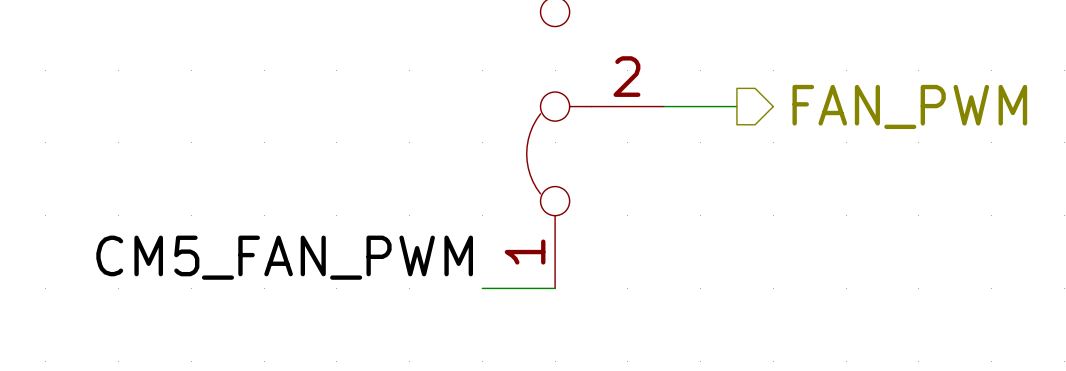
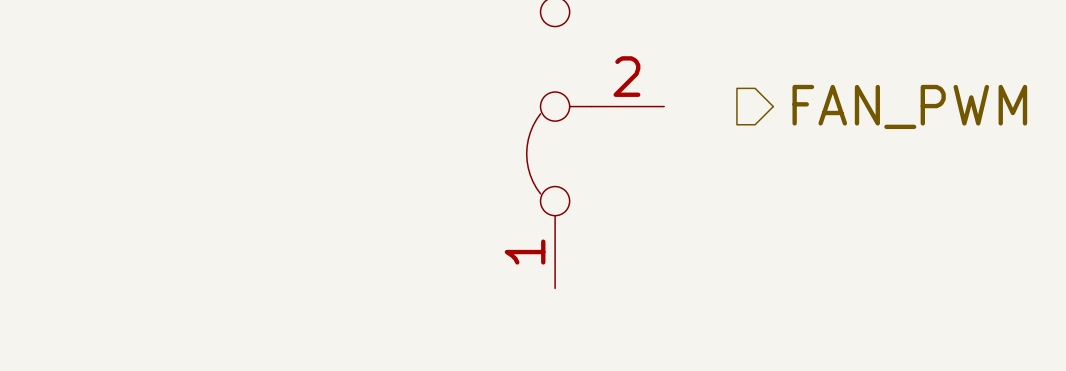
wire: (664, 106) (736, 106) -> none
label: CM5_FAN_PWM (284, 257) -> none
wire: (482, 288) (555, 288) -> none

